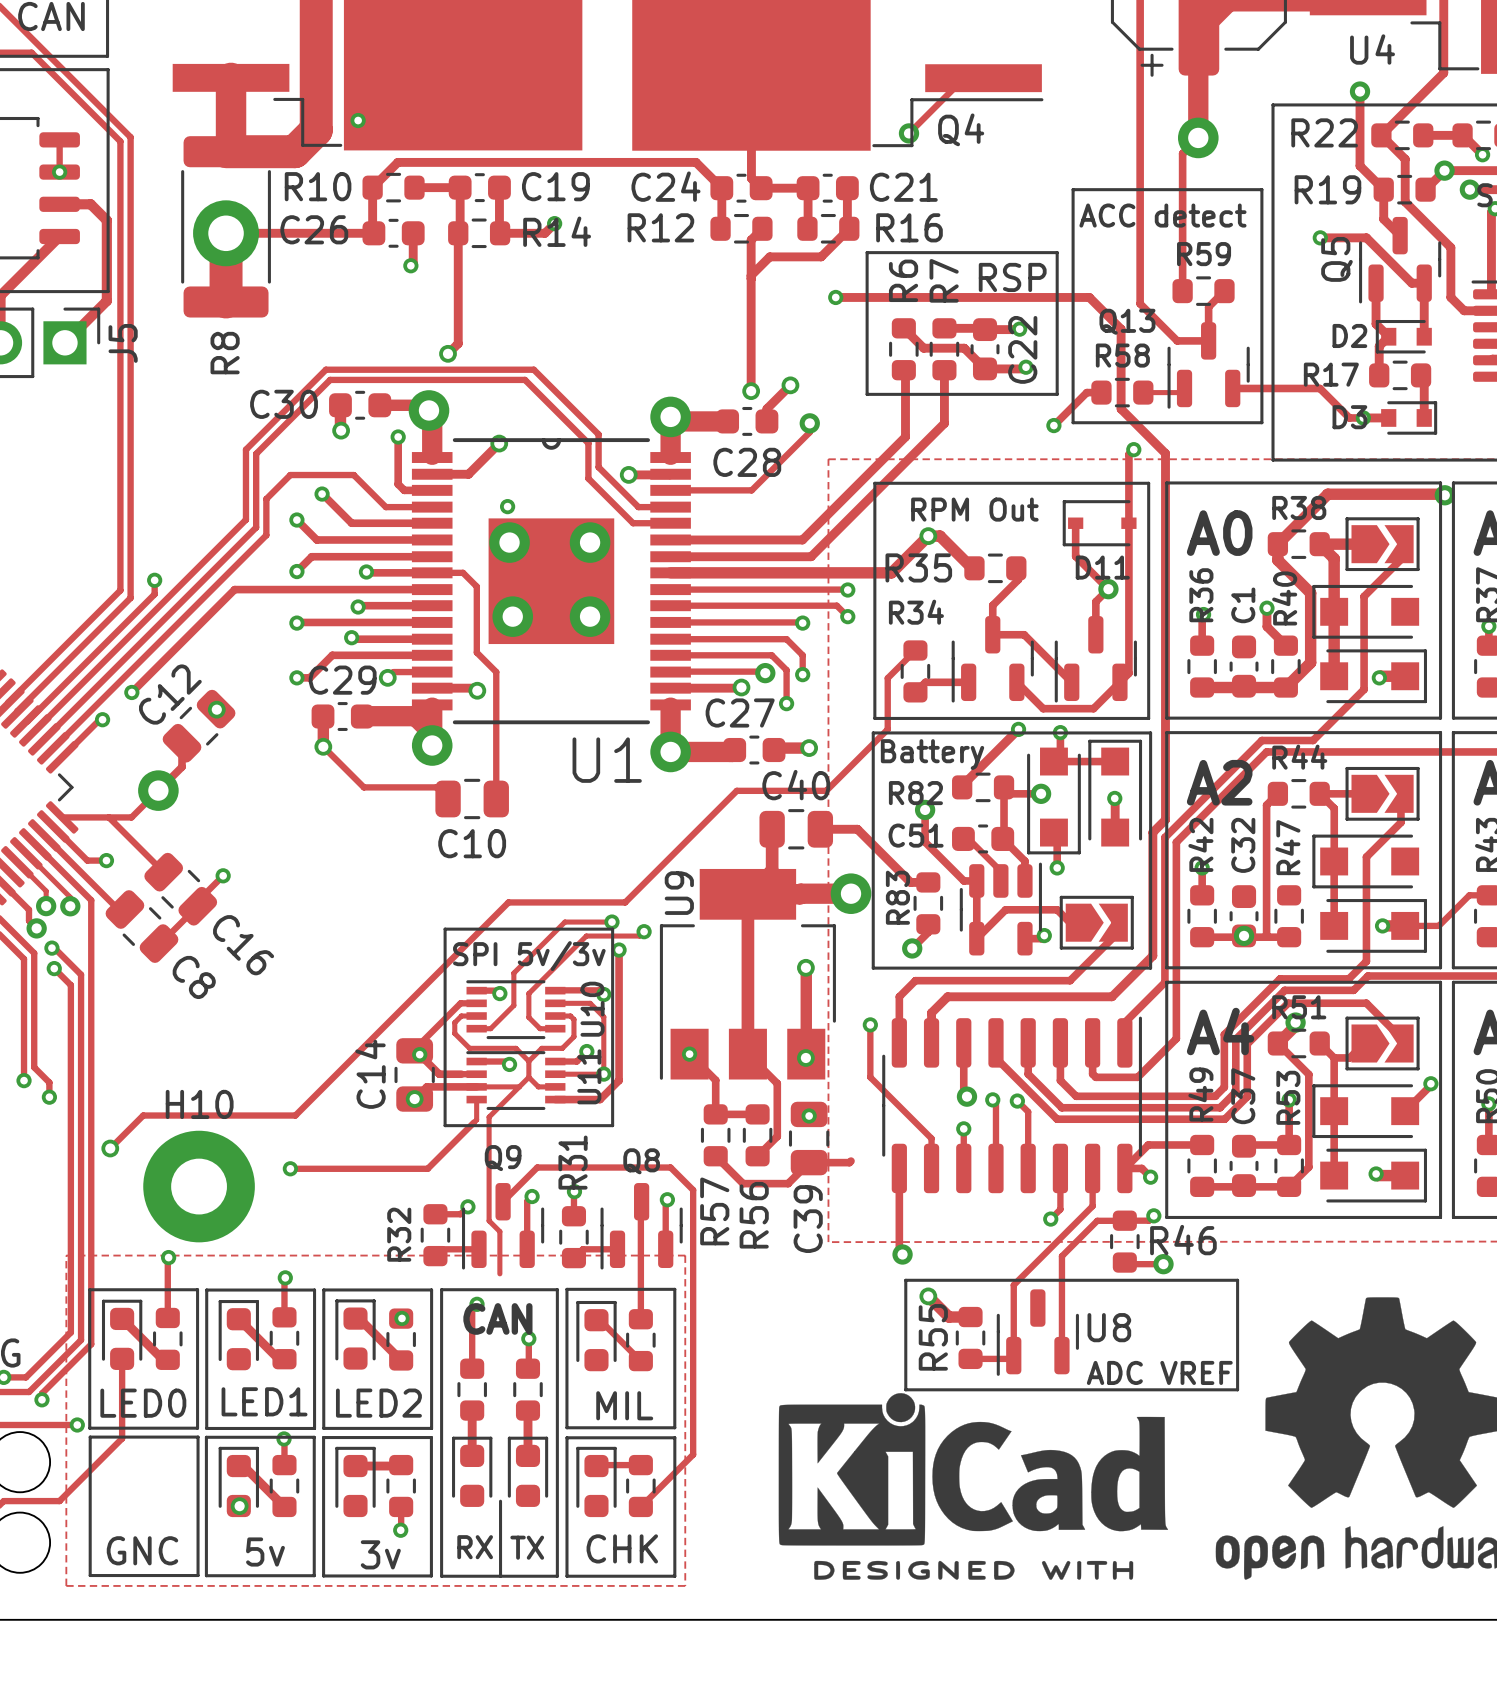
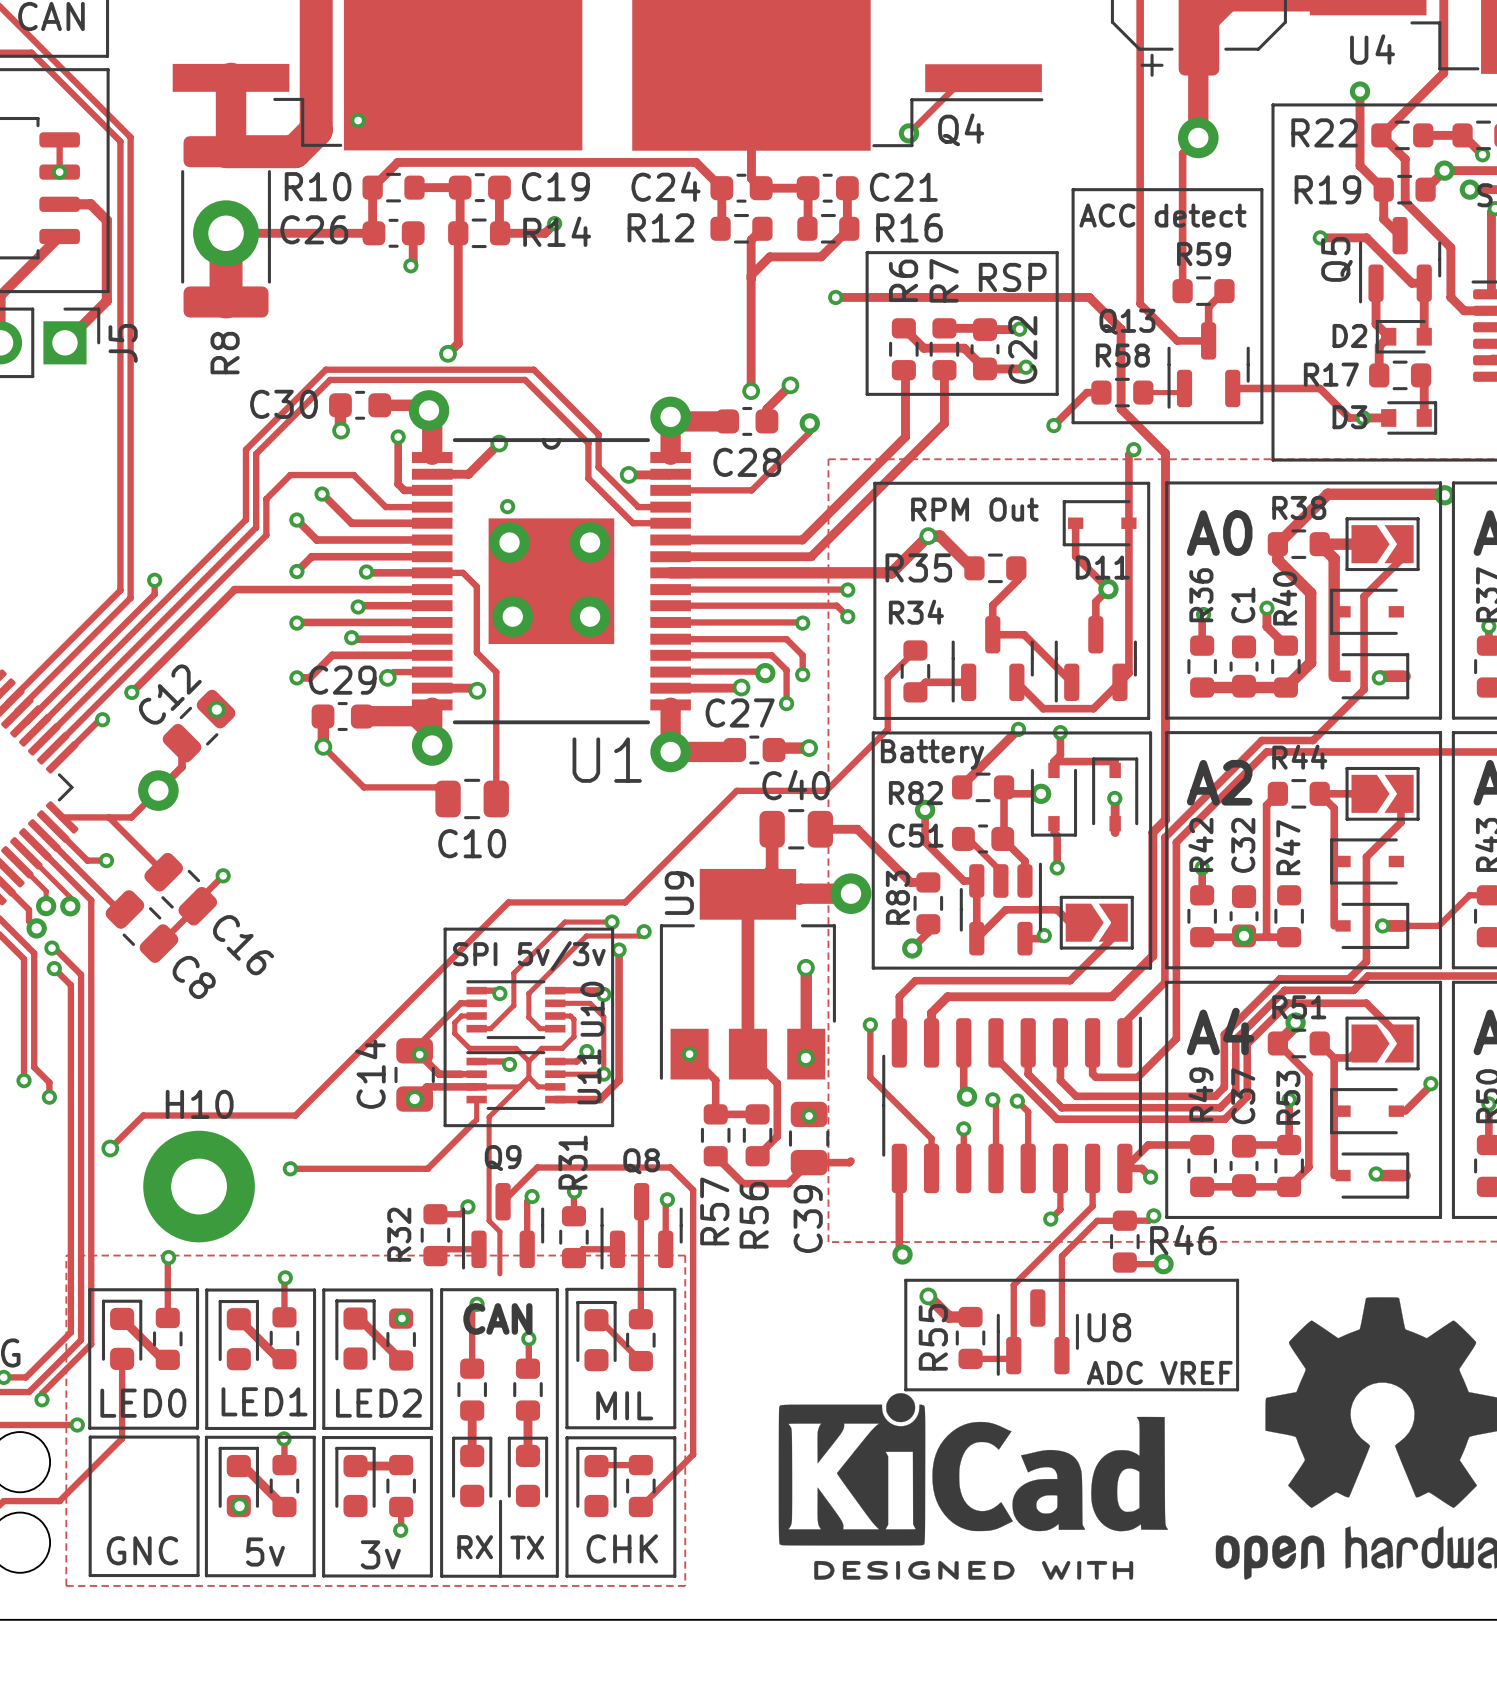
part footprint: [1312, 584, 1420, 639] -> [1330, 588, 1404, 635]
part footprint: [1320, 649, 1428, 704] -> [1335, 653, 1410, 700]
part footprint: [1088, 739, 1143, 847] -> [1092, 757, 1139, 832]
part footprint: [1027, 747, 1081, 855] -> [1030, 762, 1078, 837]
part footprint: [1312, 834, 1420, 889] -> [1330, 838, 1404, 885]
part footprint: [1320, 899, 1428, 953] -> [1335, 902, 1410, 950]
part footprint: [1312, 1084, 1420, 1139] -> [1330, 1088, 1404, 1135]
part footprint: [1320, 1148, 1428, 1203] -> [1335, 1152, 1410, 1199]

